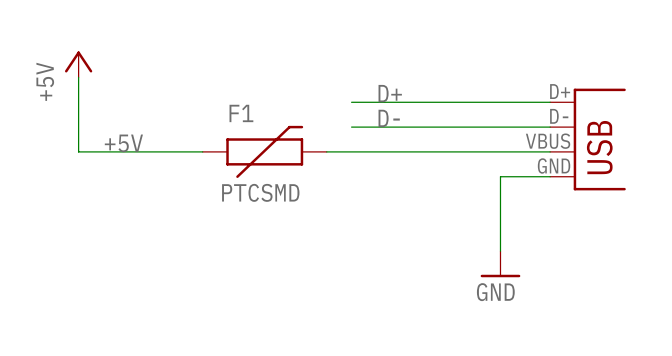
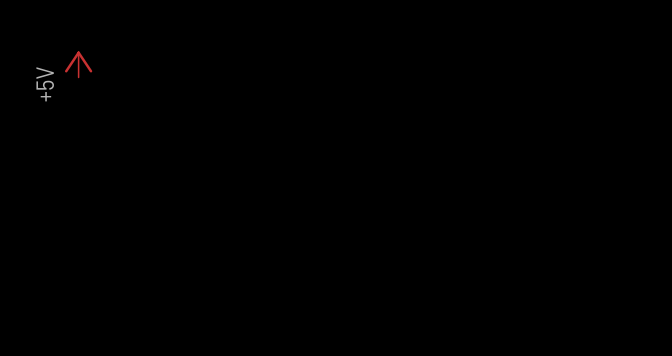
wire: (78, 77) (78, 151) (202, 151) -> none
label: D+ (390, 93) -> none
wire: (351, 102) (550, 102) -> none
label: D- (389, 118) -> none
wire: (351, 127) (550, 127) -> none
part: (587, 139) -> none
label: +5V (123, 143) -> none
F1: PTCSMD (264, 151) -> none
wire: (326, 151) (550, 151) -> none
wire: (550, 176) (500, 176) (500, 251) -> none
power symbol: GND (500, 264) -> none

